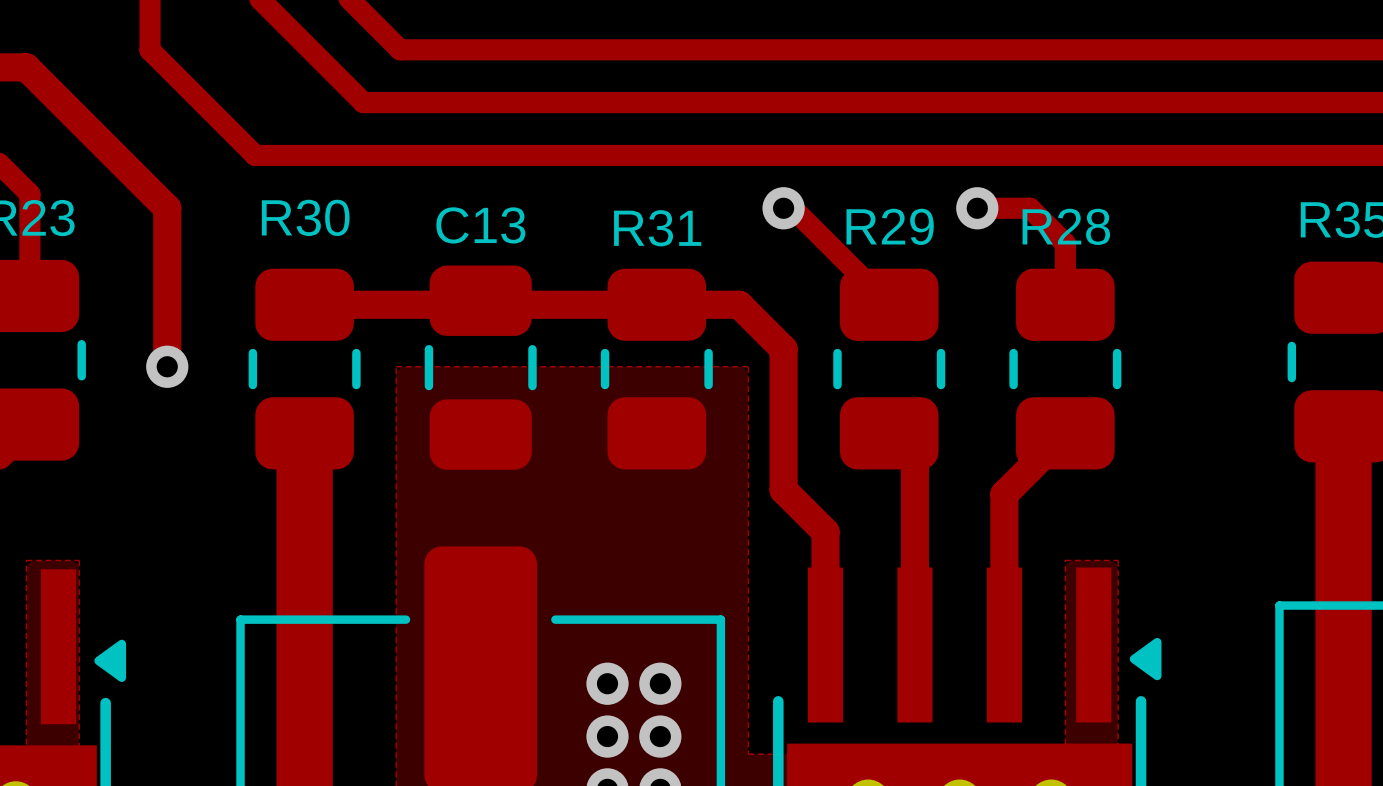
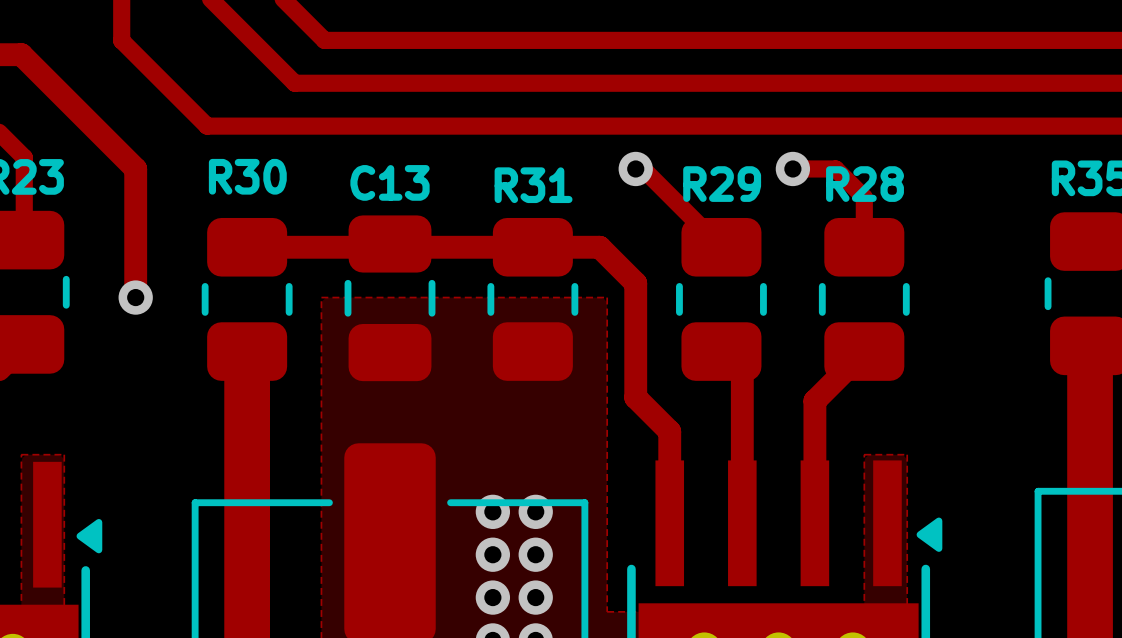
via: none -> (492, 511)
via: none -> (535, 511)

